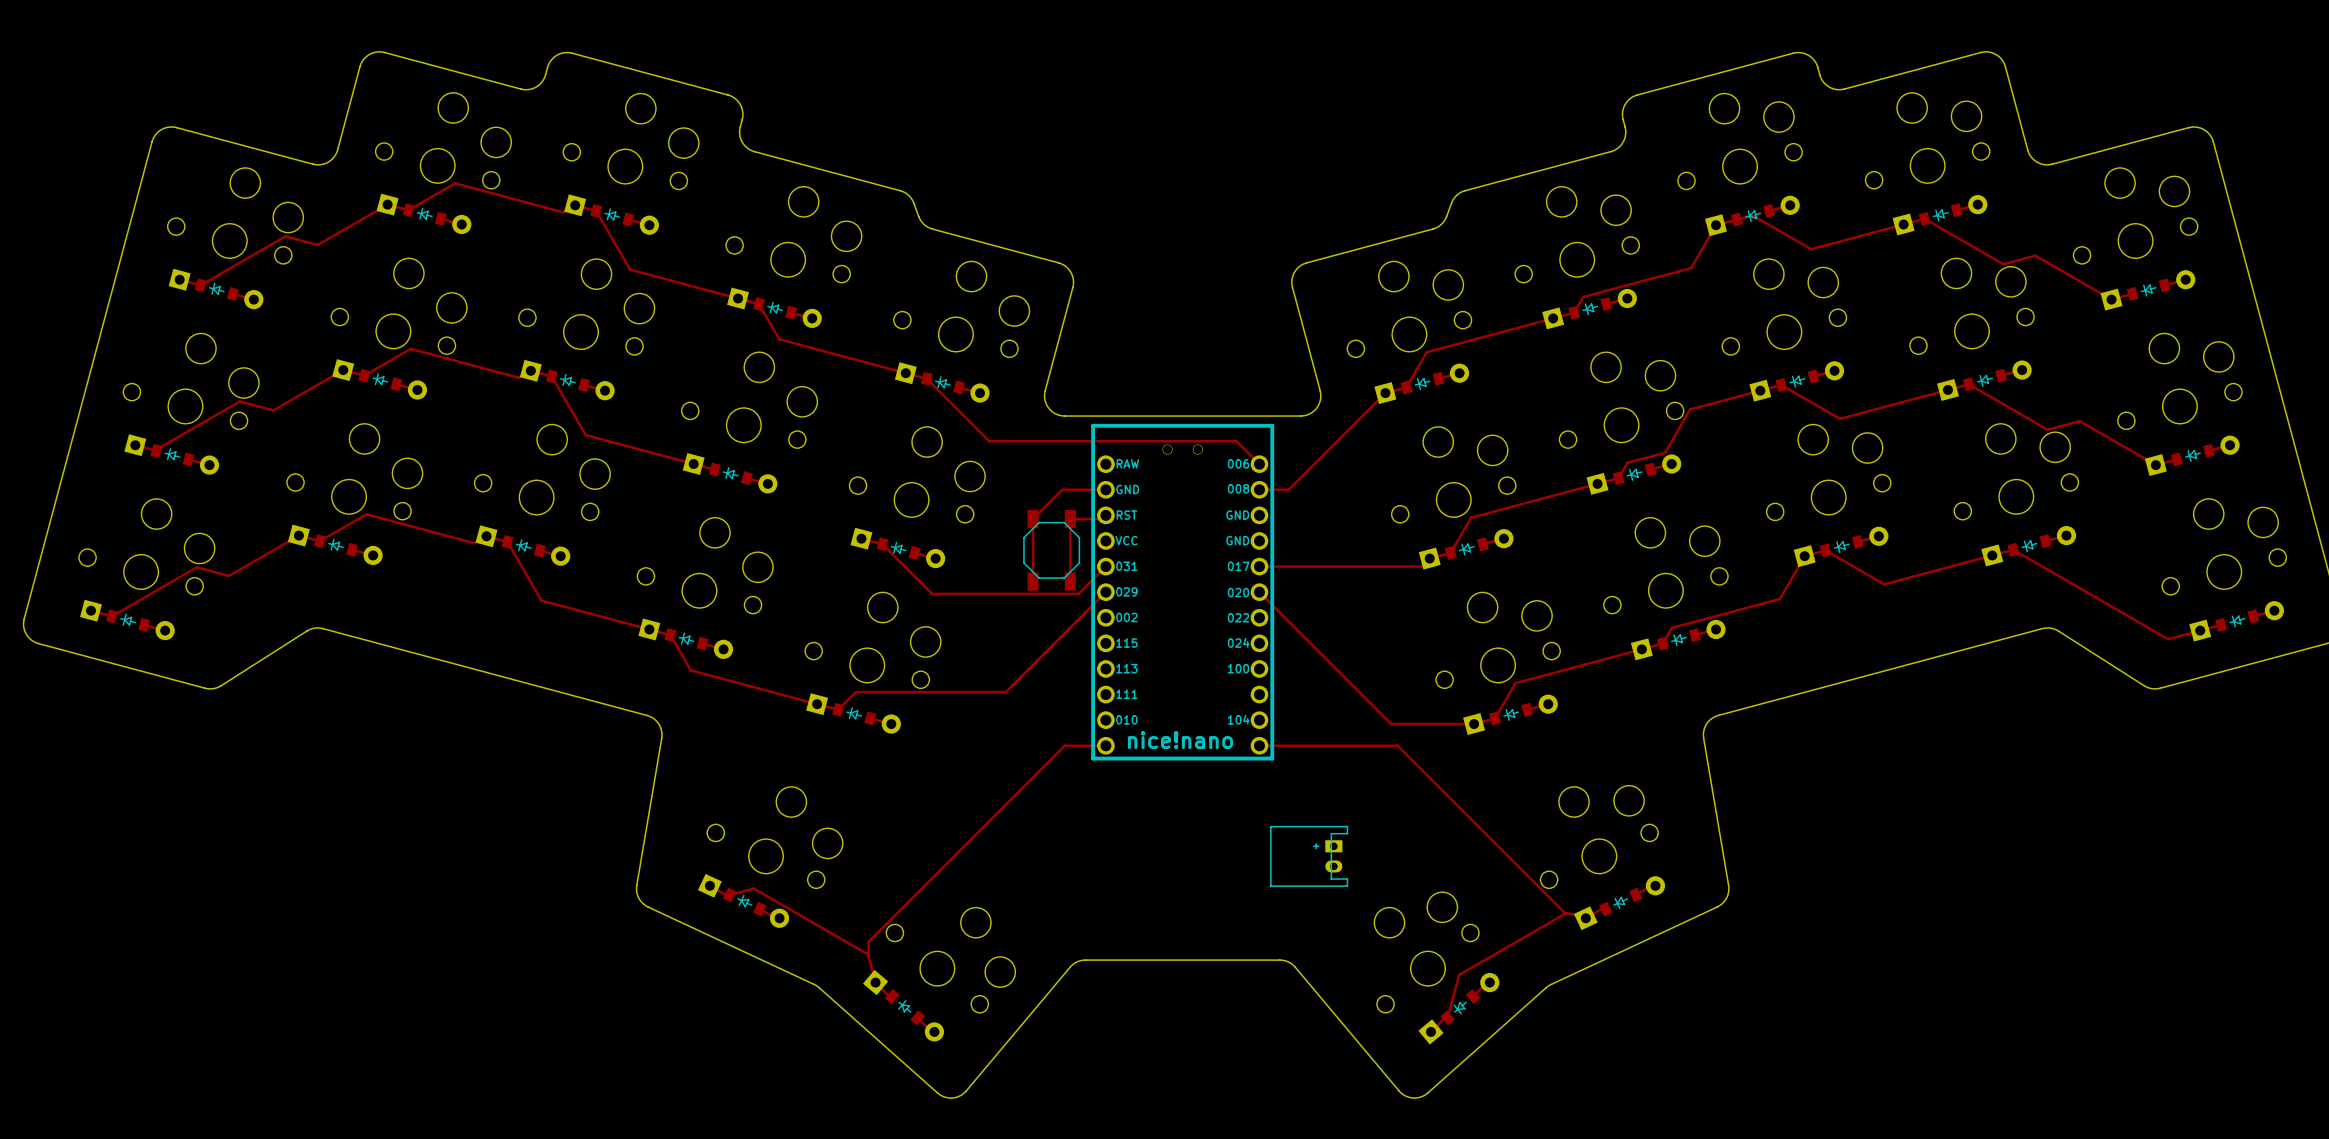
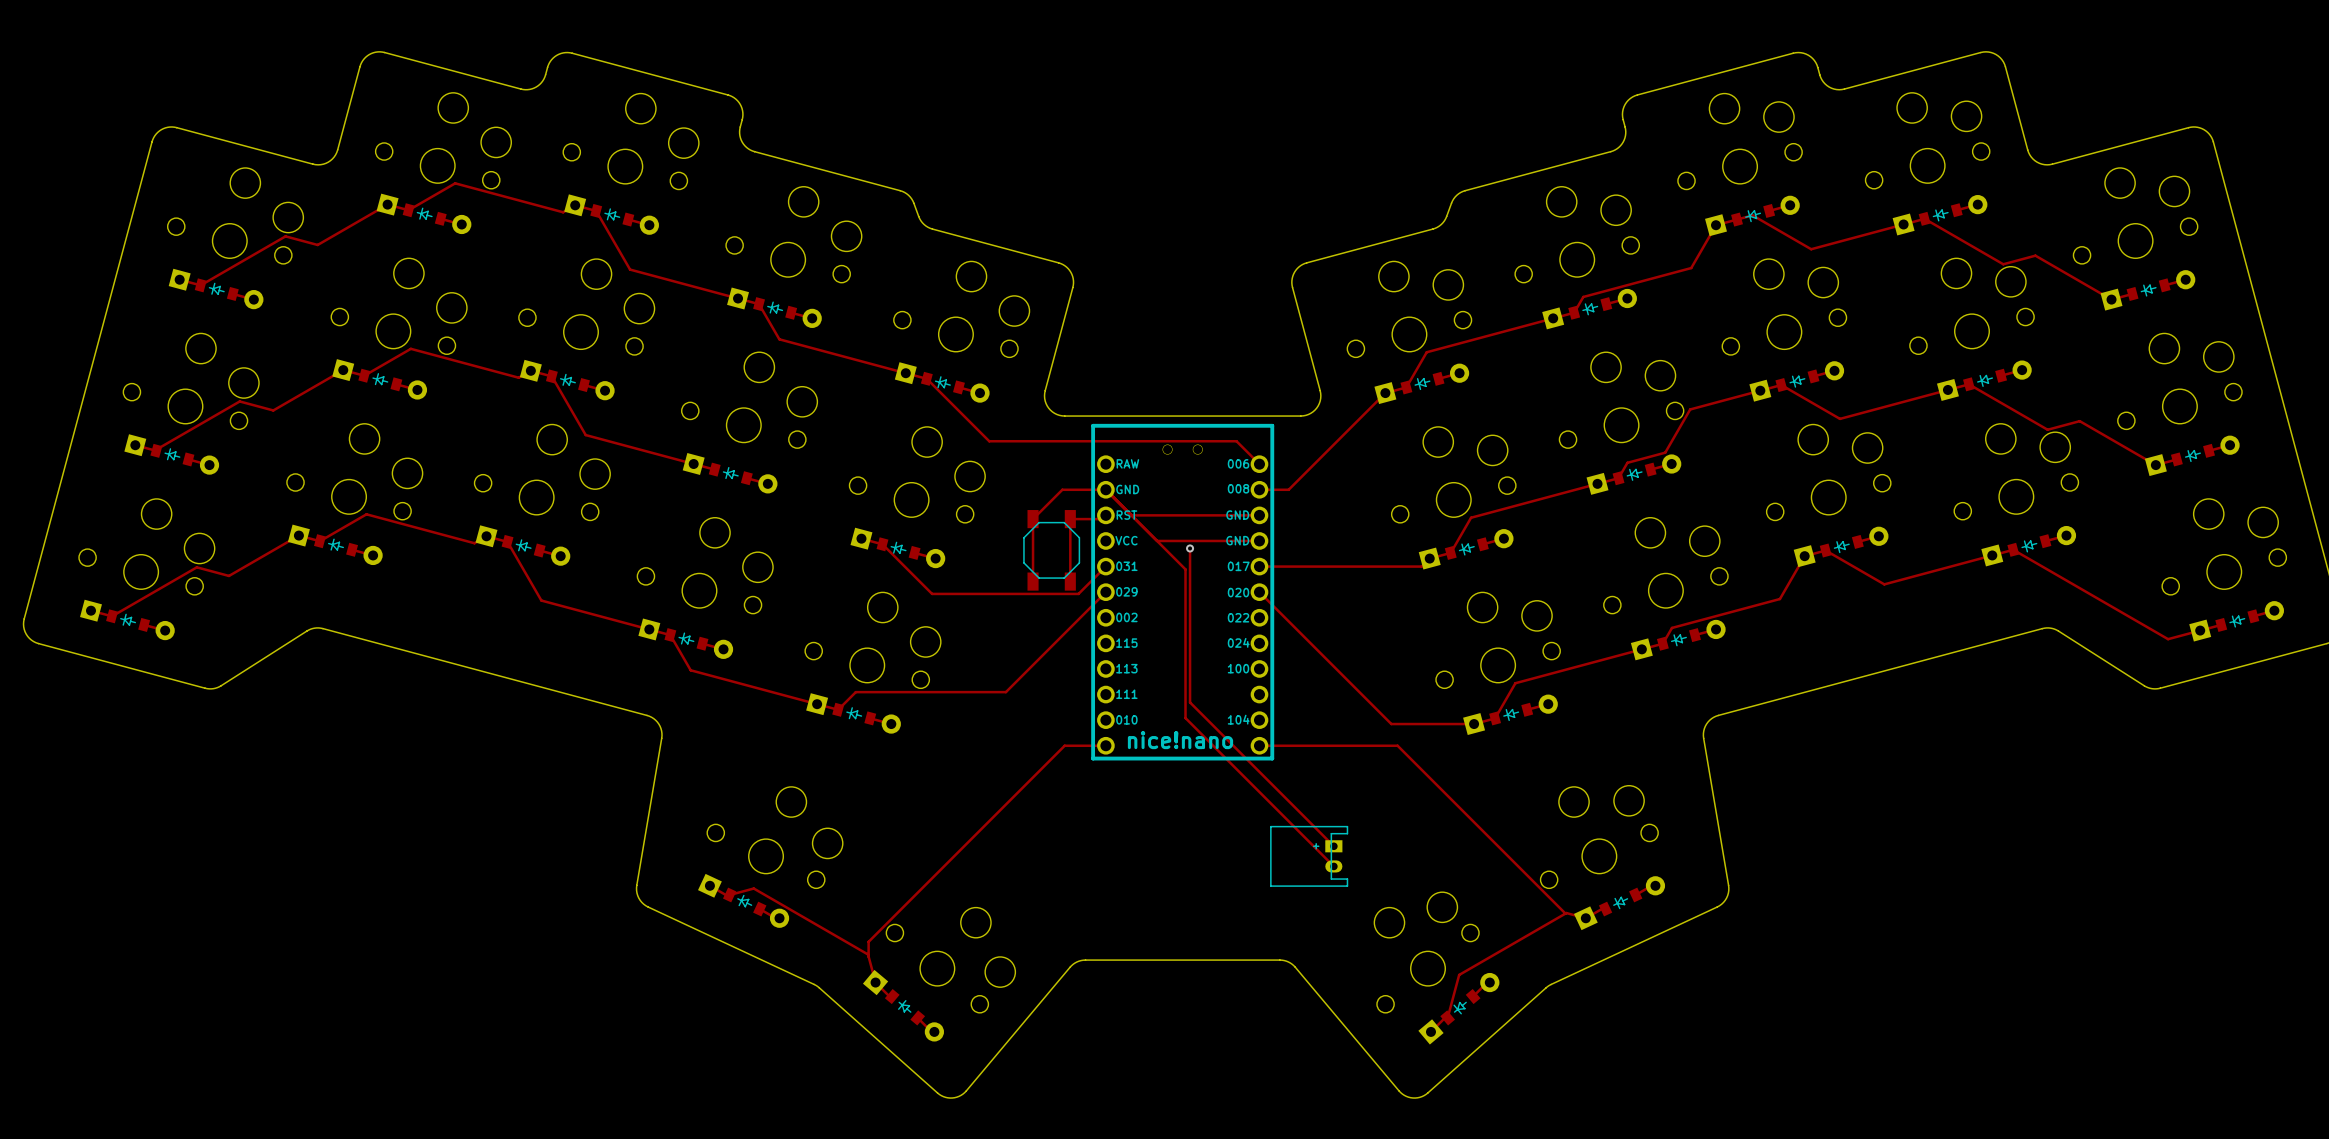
track: none -> (1105, 489) (1185, 569) (1185, 718) (1333, 866)
track: none -> (1131, 515) (1259, 515)
track: none -> (1157, 540) (1259, 540)
track: none -> (1190, 548) (1190, 702) (1333, 846)
via: none -> (1190, 548)

